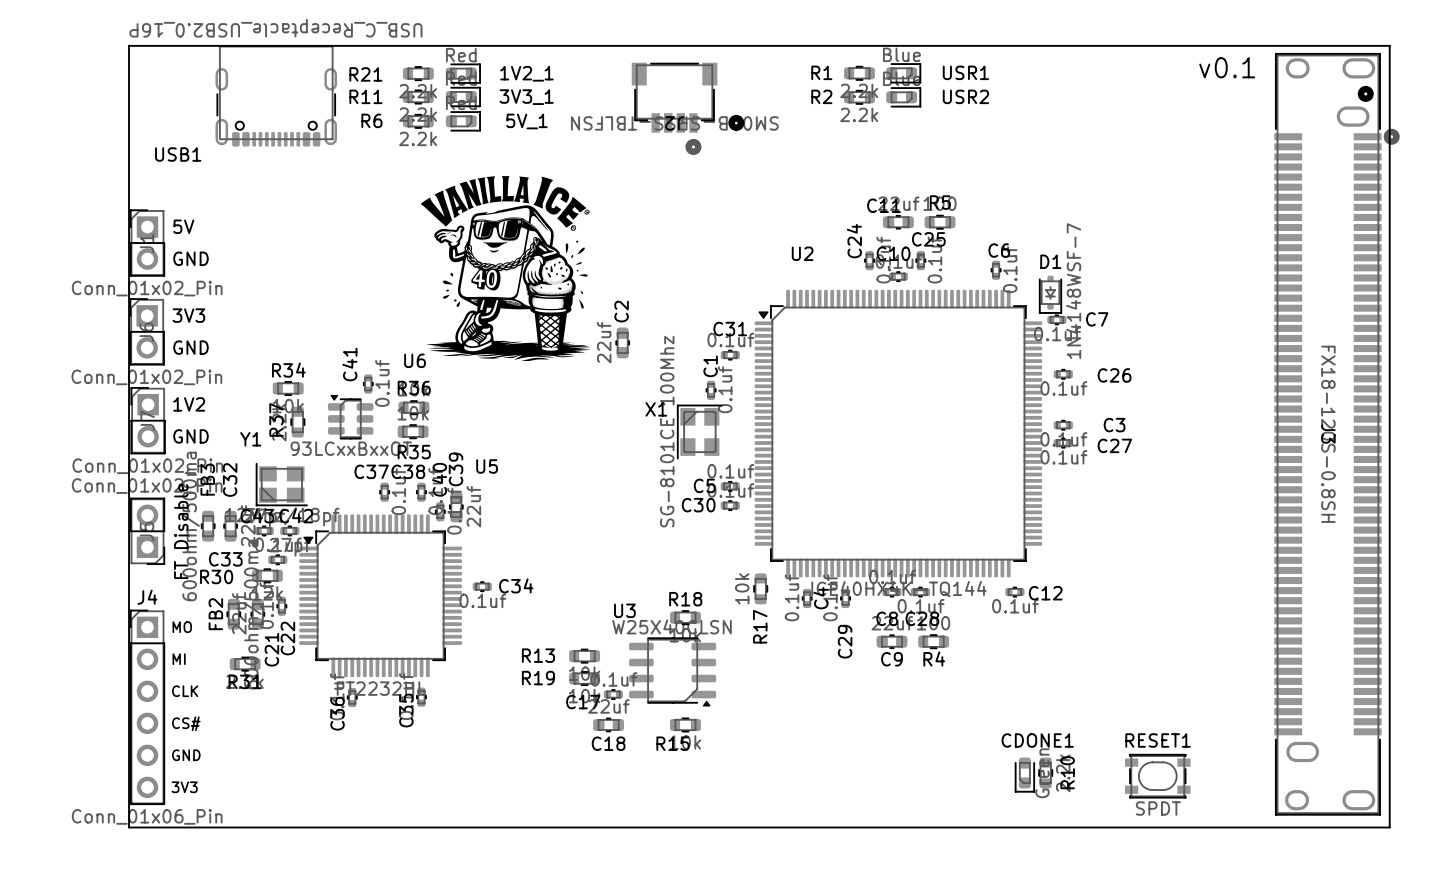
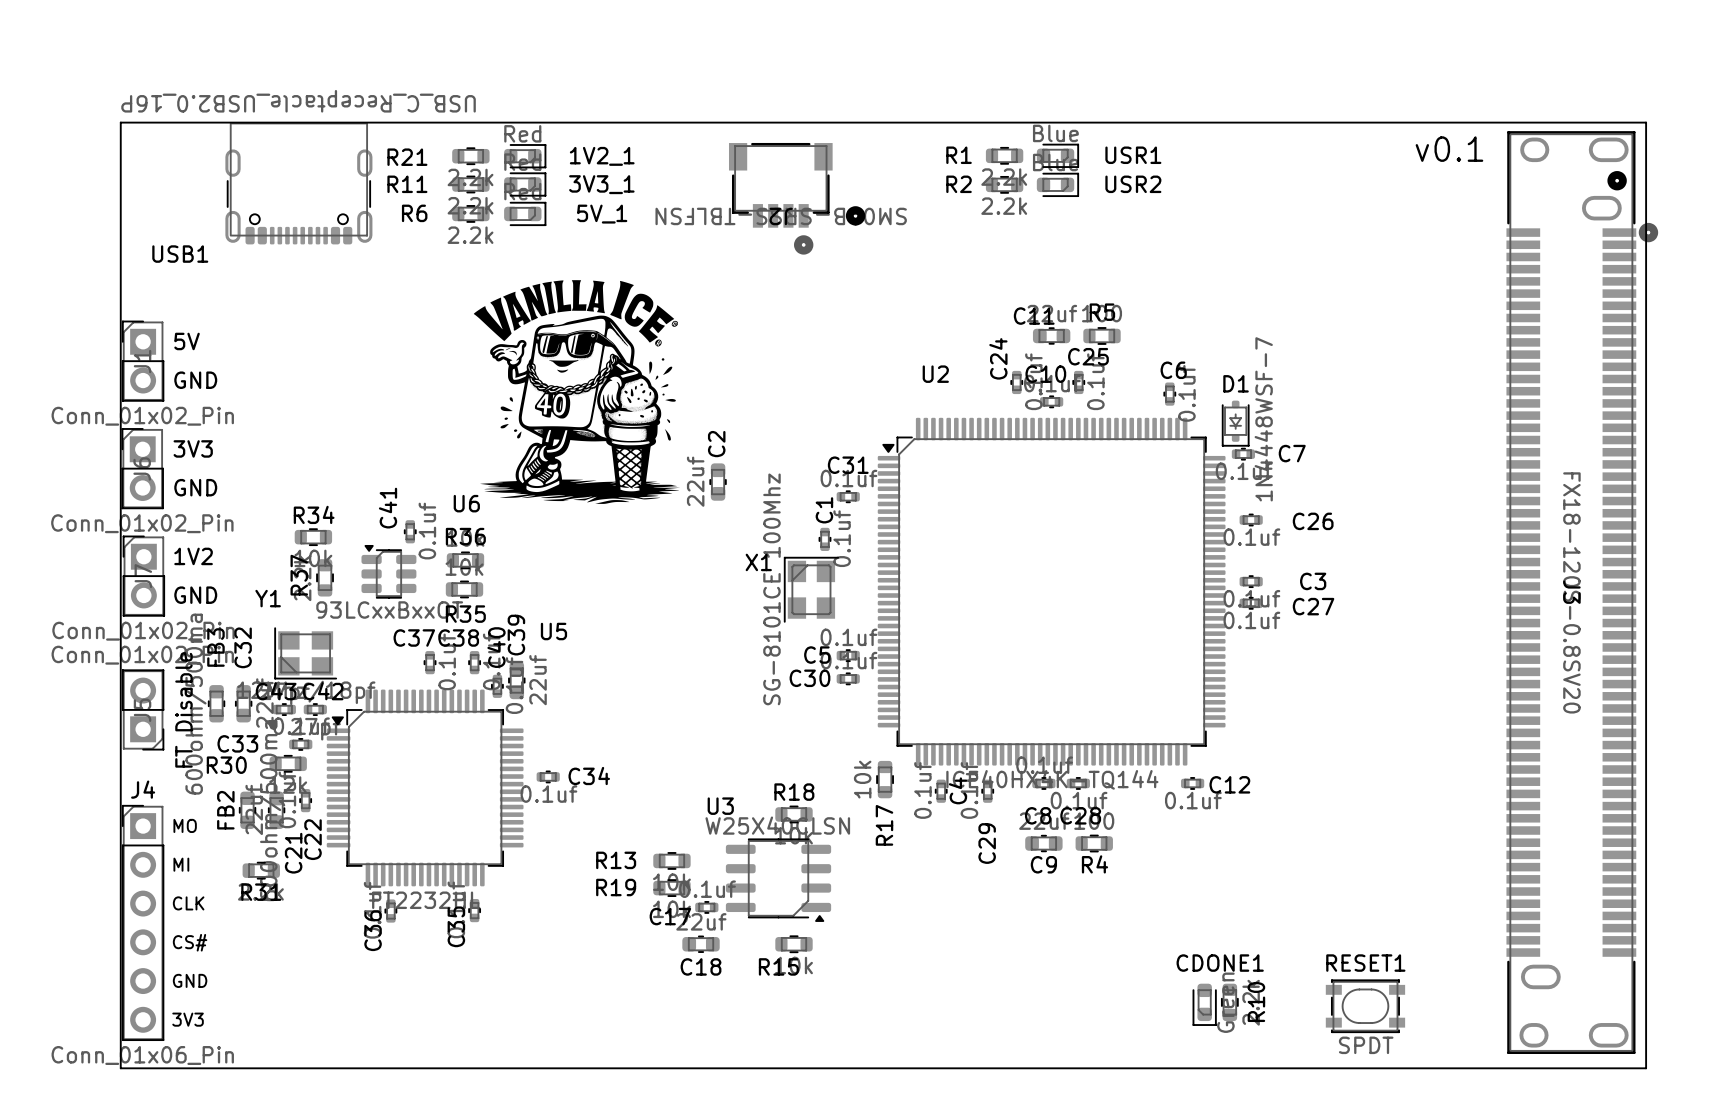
D1 value: 1N4148WSF-7 (1073, 291) -> 1N4448WSF-7 (1263, 419)
J3 value: FX18-120S-0.8SH (1328, 434) -> FX18-120S-0.8SV20 (1571, 592)

